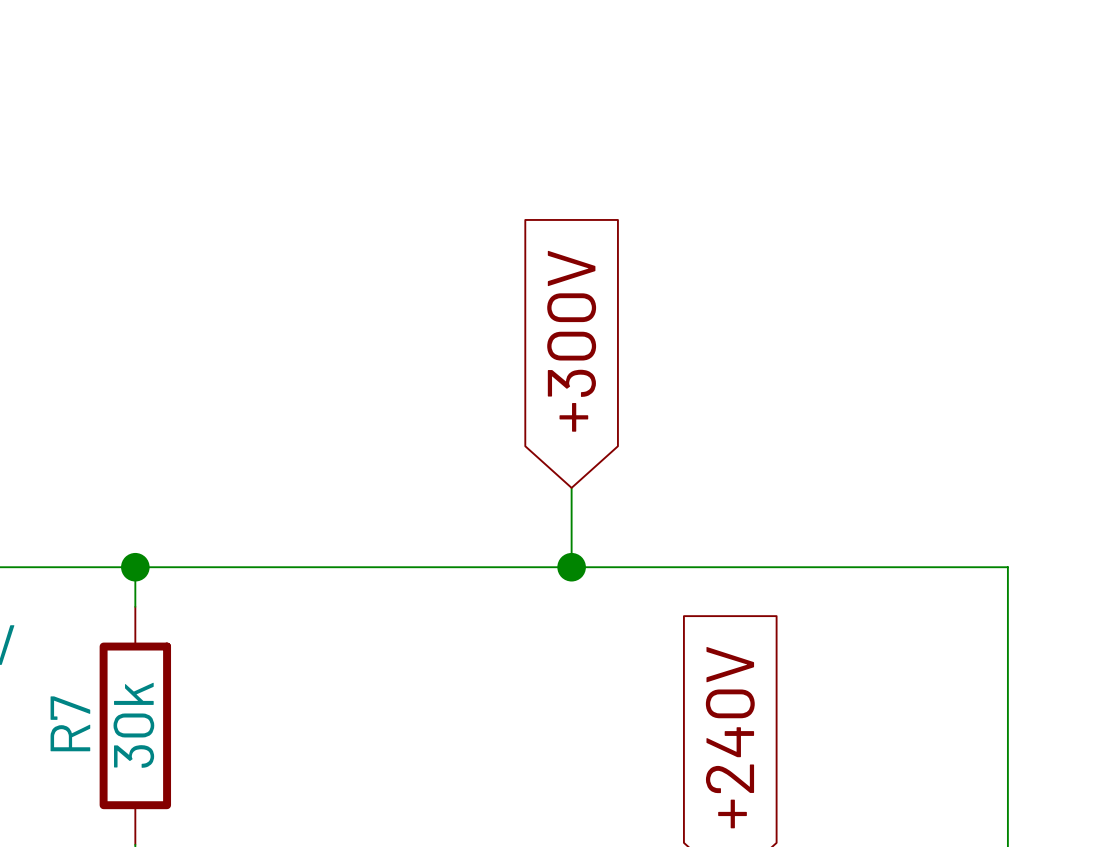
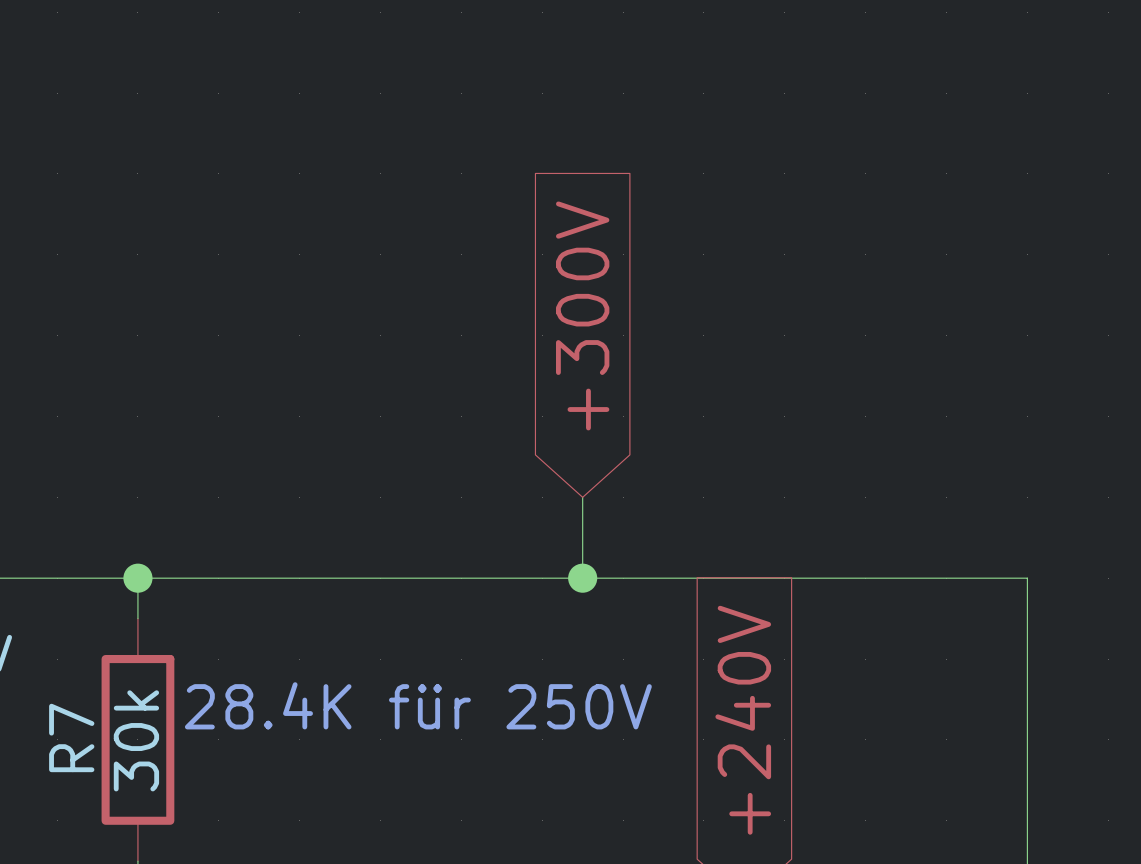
text: none -> 28.4K für 250V (418, 705)

